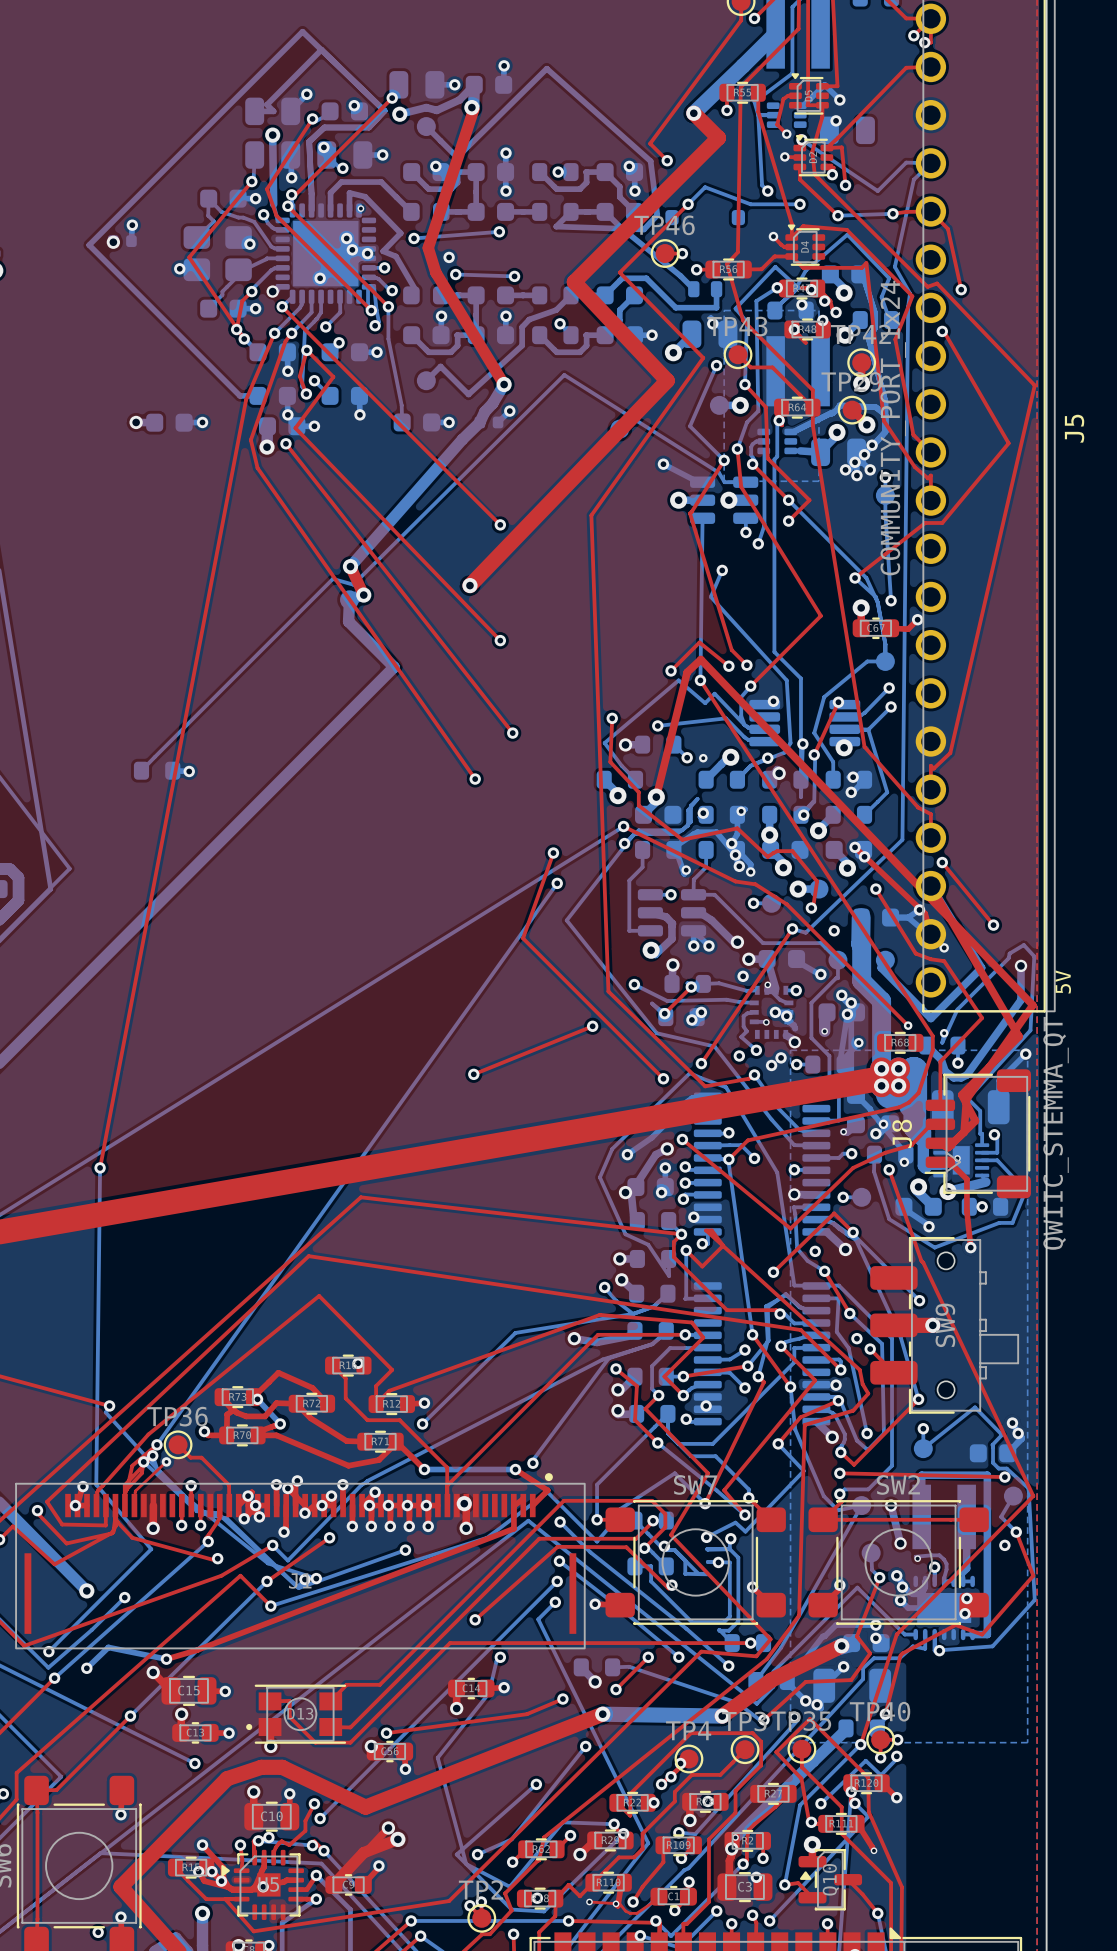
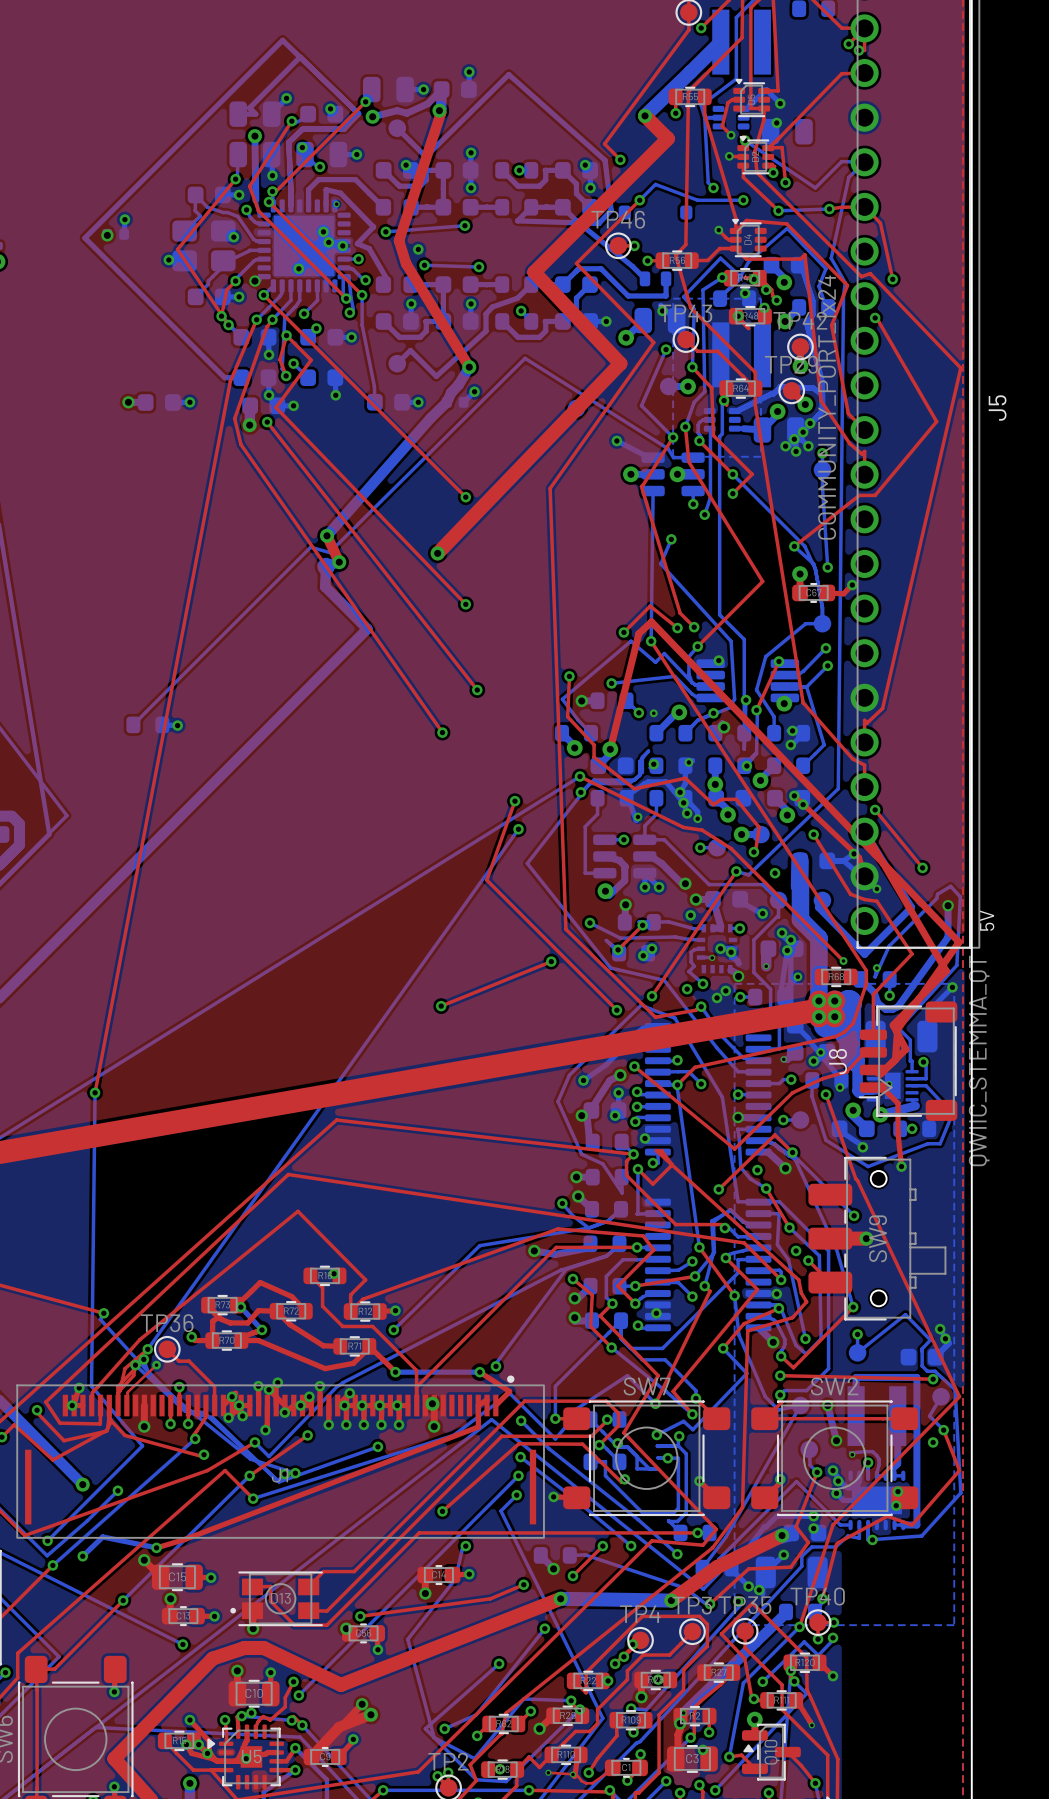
bottom track: (767, 984) (767, 987) (779, 999) (786, 1002) -> none
via: (767, 984) -> none

